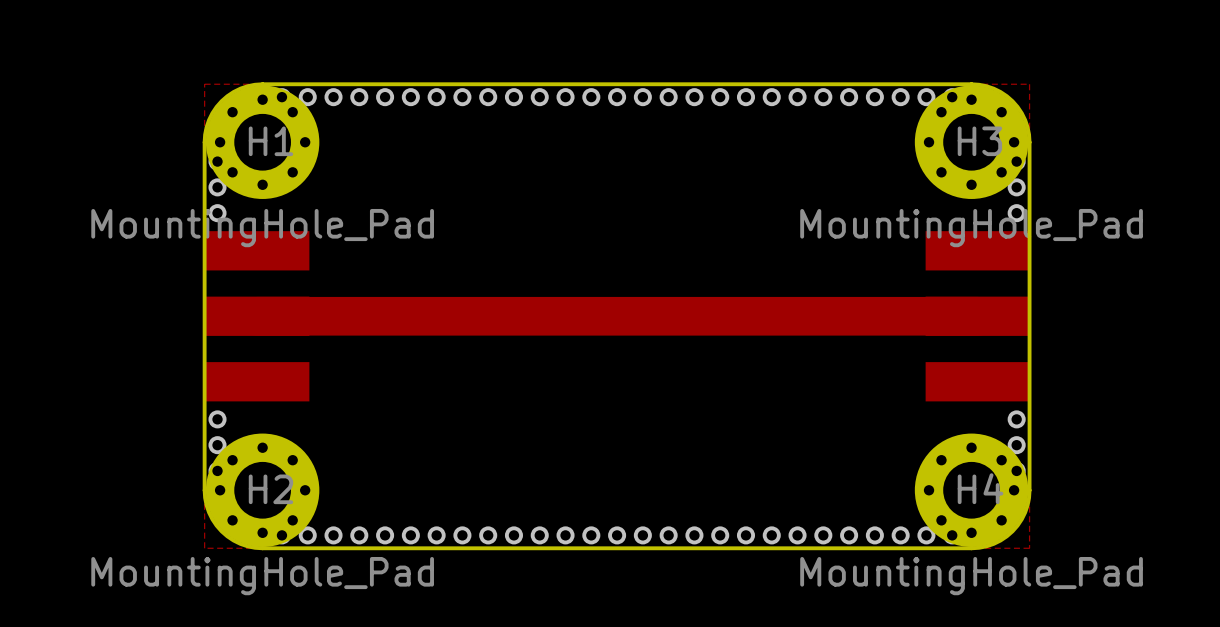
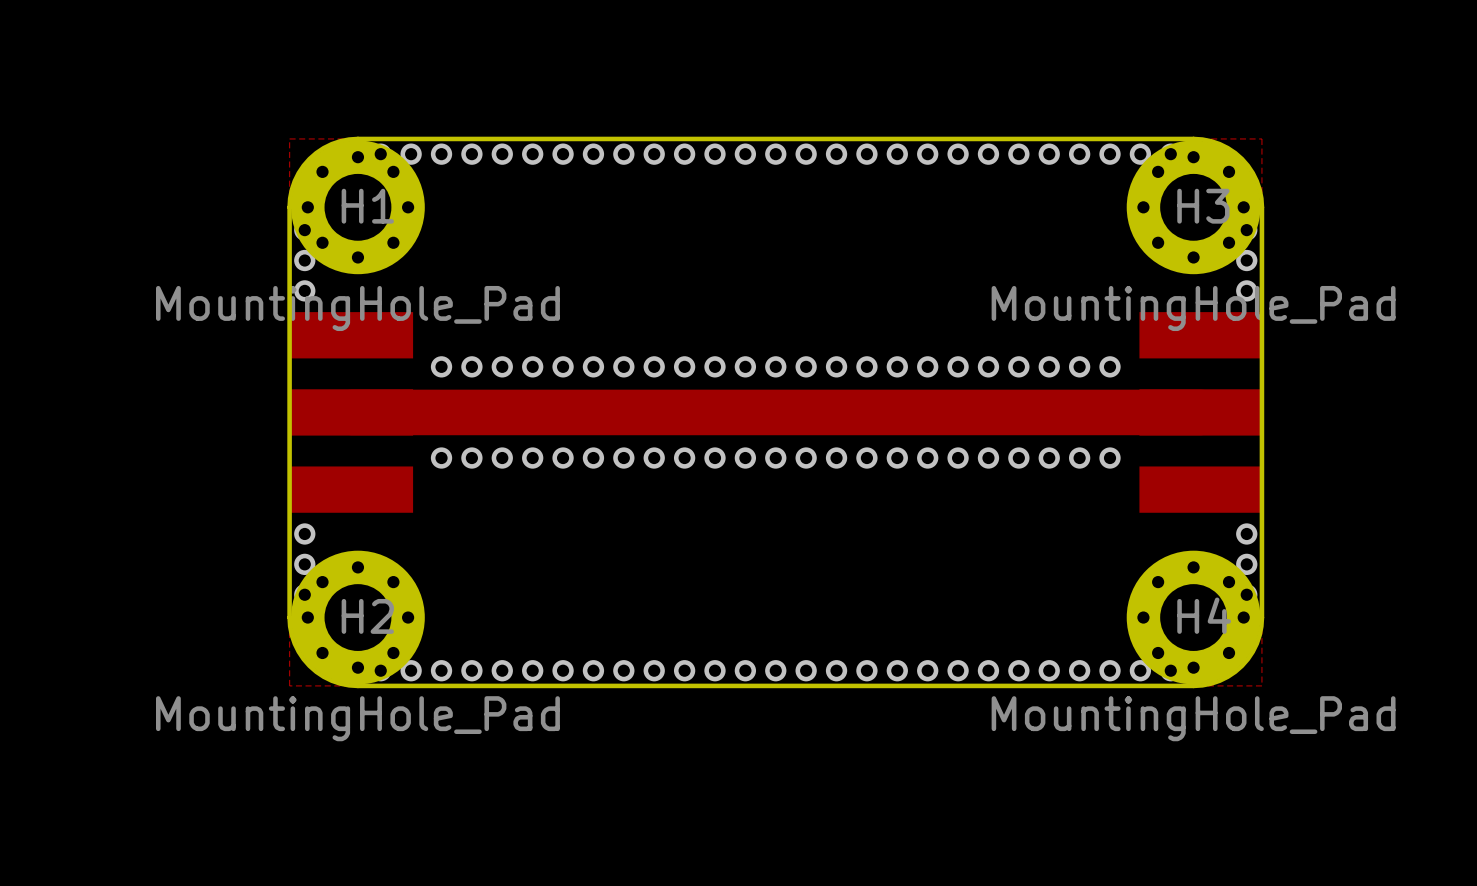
via: none -> (441, 366)
via: none -> (471, 366)
via: none -> (502, 366)
via: none -> (532, 366)
via: none -> (563, 366)
via: none -> (593, 366)
via: none -> (623, 366)
via: none -> (654, 366)
via: none -> (684, 366)
via: none -> (714, 366)
via: none -> (745, 366)
via: none -> (775, 366)
via: none -> (806, 366)
via: none -> (836, 366)
via: none -> (866, 366)
via: none -> (897, 366)
via: none -> (927, 366)
via: none -> (958, 366)
via: none -> (988, 366)
via: none -> (1018, 366)
via: none -> (1049, 366)
via: none -> (1079, 366)
via: none -> (1110, 366)
via: none -> (441, 458)
via: none -> (471, 458)
via: none -> (502, 458)
via: none -> (532, 458)
via: none -> (563, 458)
via: none -> (593, 458)
via: none -> (623, 458)
via: none -> (654, 458)
via: none -> (684, 458)
via: none -> (714, 458)
via: none -> (745, 458)
via: none -> (775, 458)
via: none -> (806, 458)
via: none -> (836, 458)
via: none -> (866, 458)
via: none -> (897, 458)
via: none -> (927, 458)
via: none -> (958, 458)
via: none -> (988, 458)
via: none -> (1018, 458)
via: none -> (1049, 458)
via: none -> (1079, 458)
via: none -> (1110, 458)

